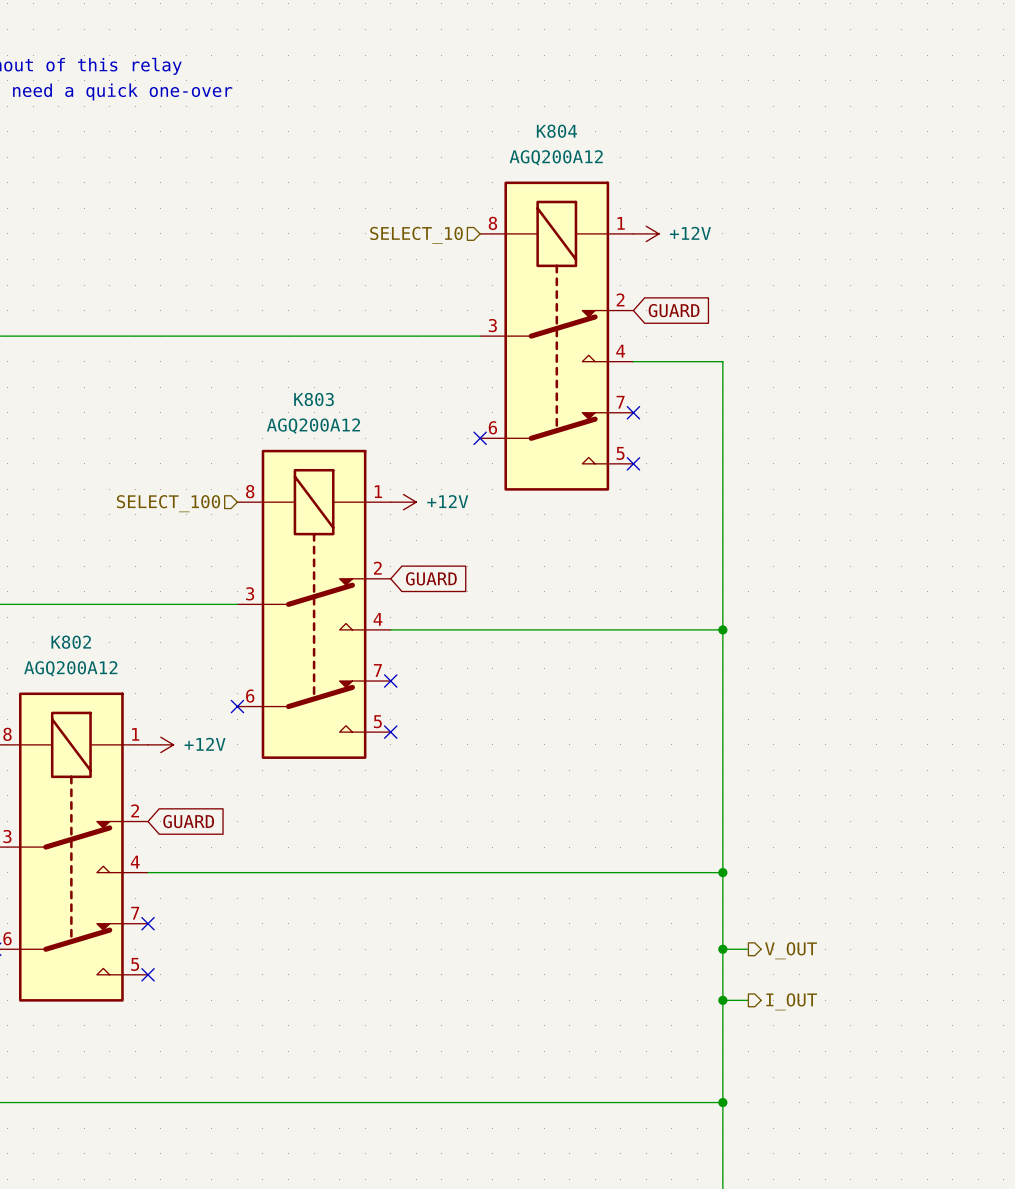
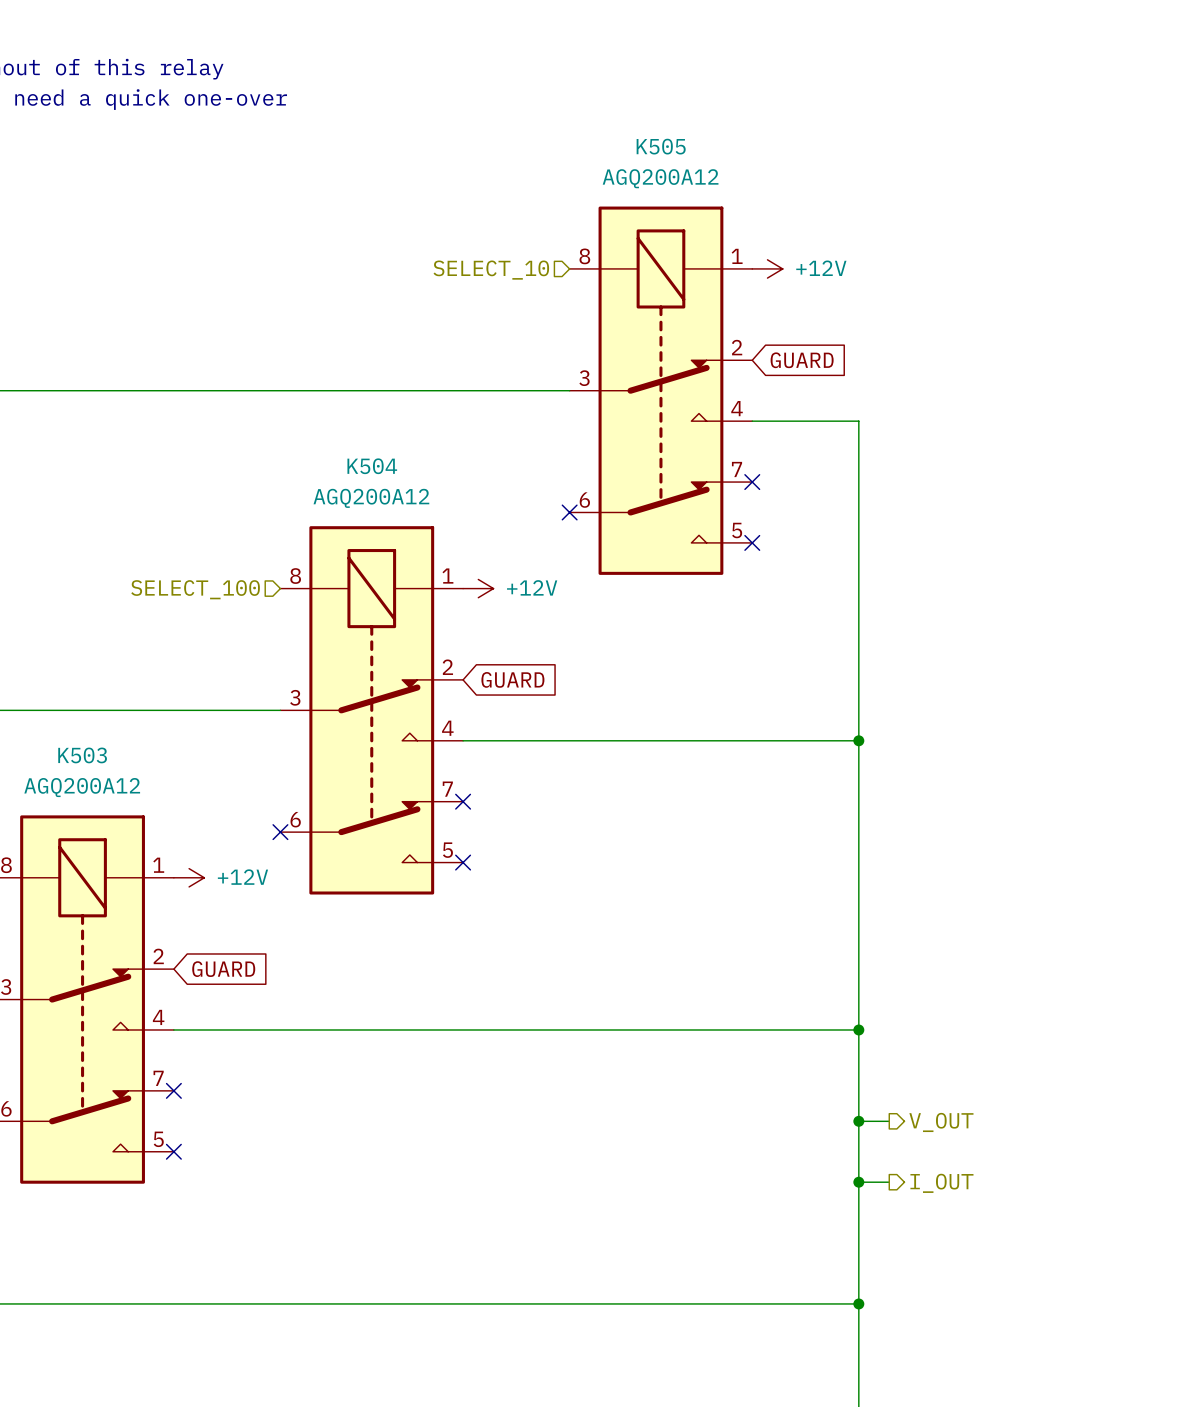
K804 name: K804 (556, 131) -> K505 (661, 146)
K803 name: K803 (314, 399) -> K504 (372, 466)
K802 name: K802 (71, 642) -> K503 (82, 755)

